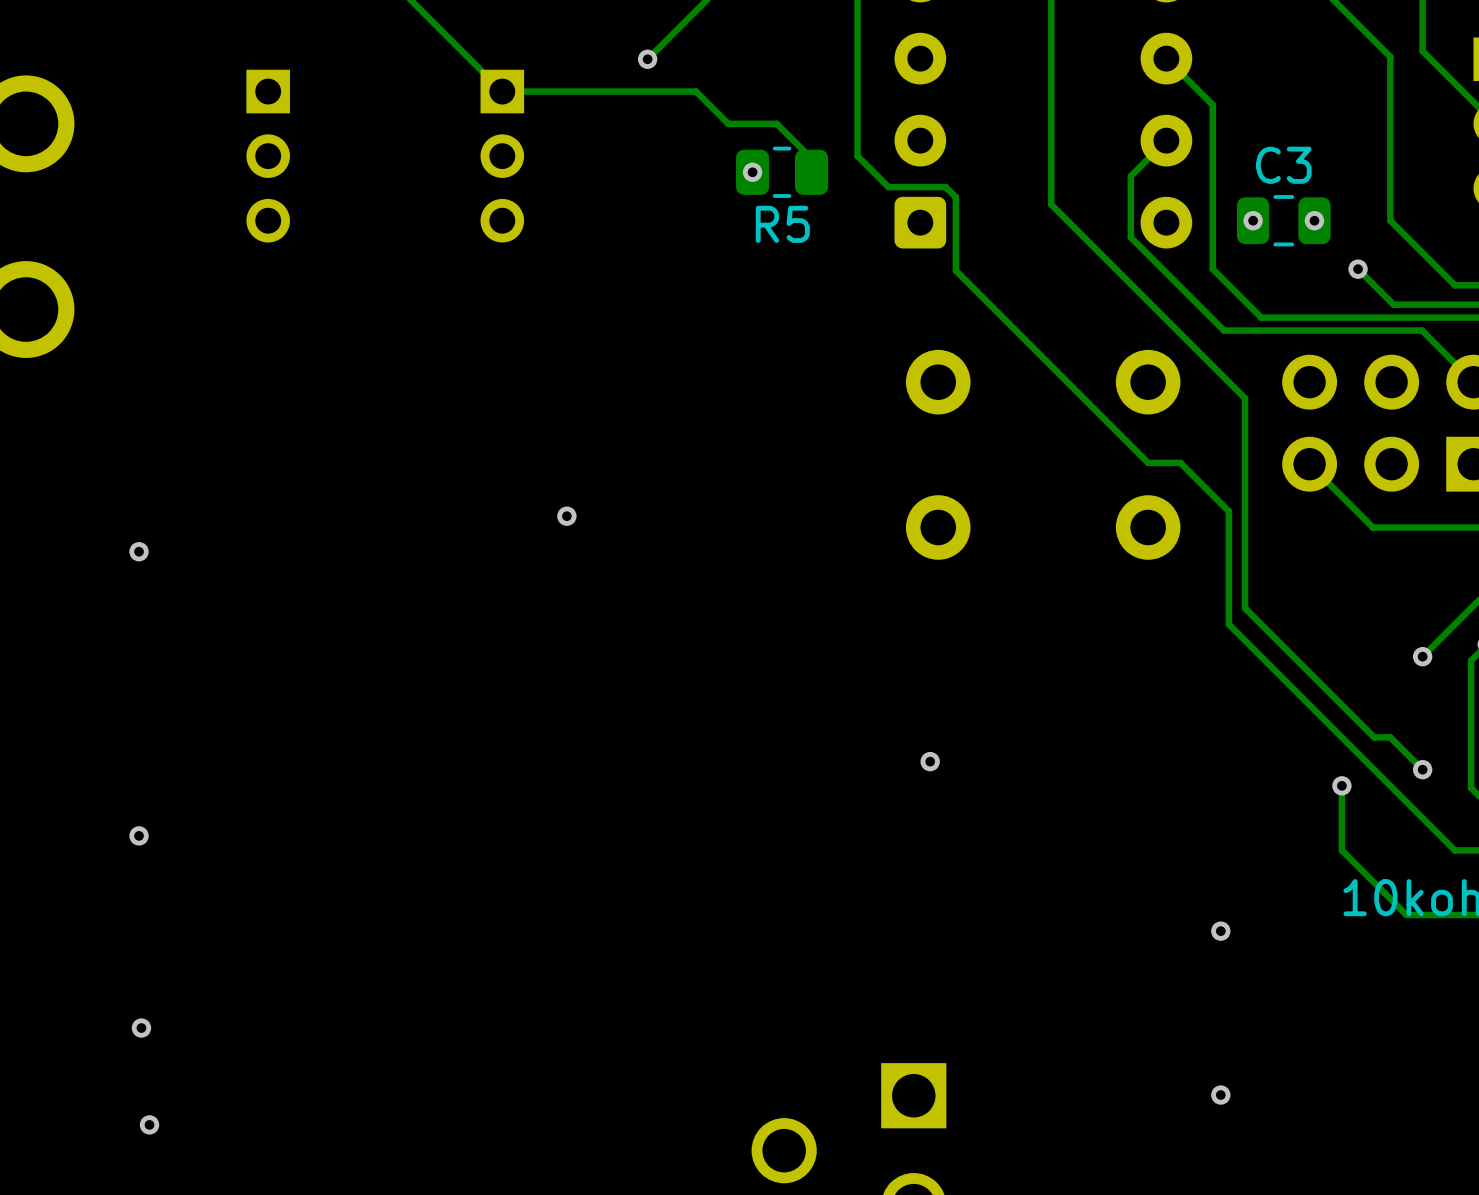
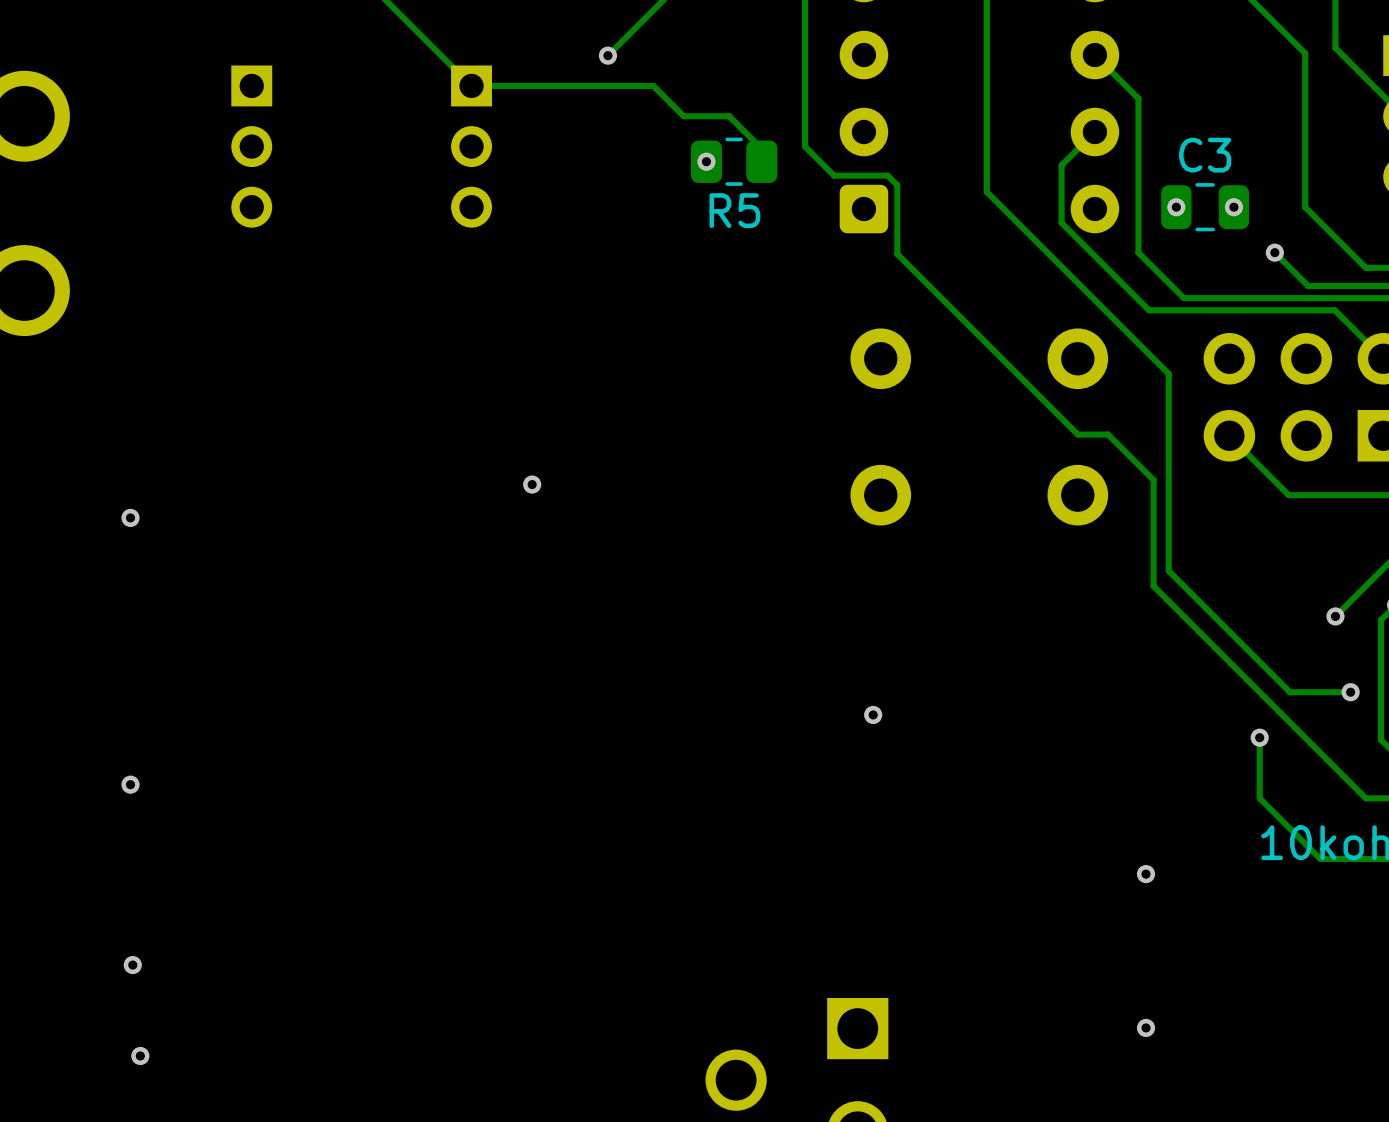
track: (1390, 737) (1422, 769) -> (1305, 692) (1350, 692)
via position: (1422, 769) -> (1350, 692)

